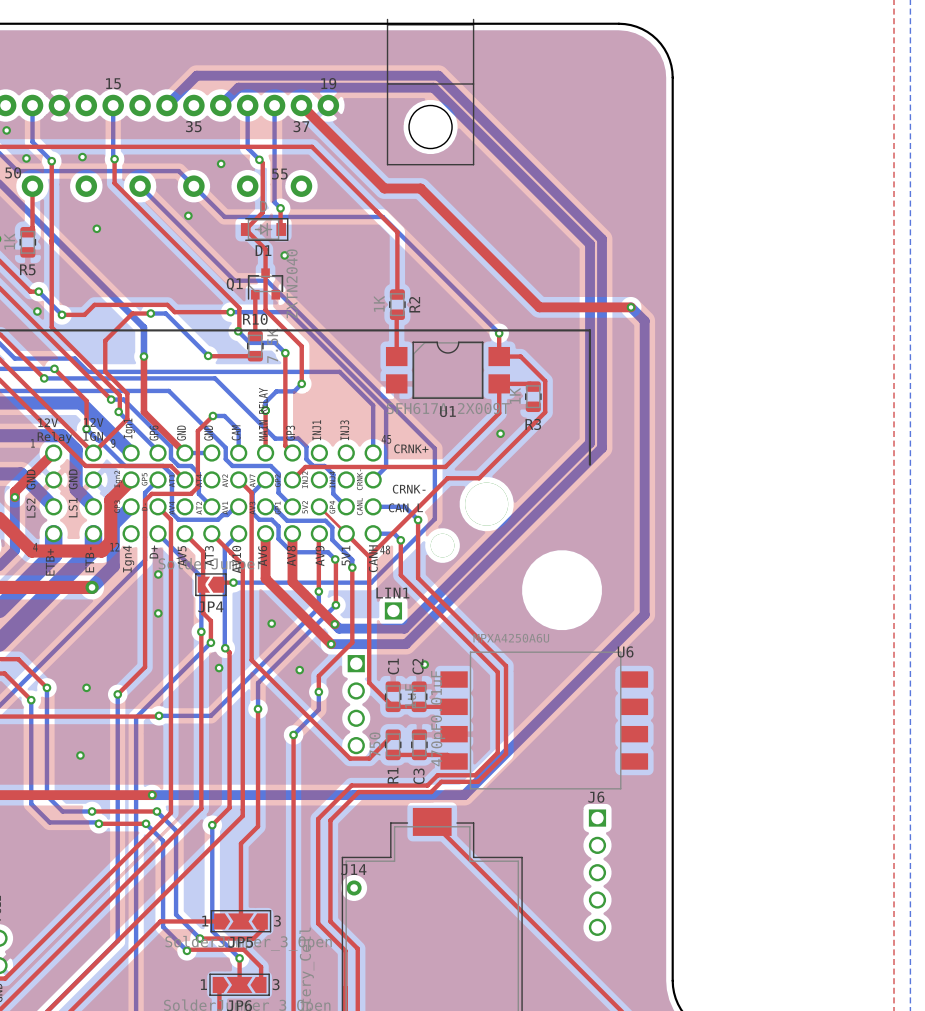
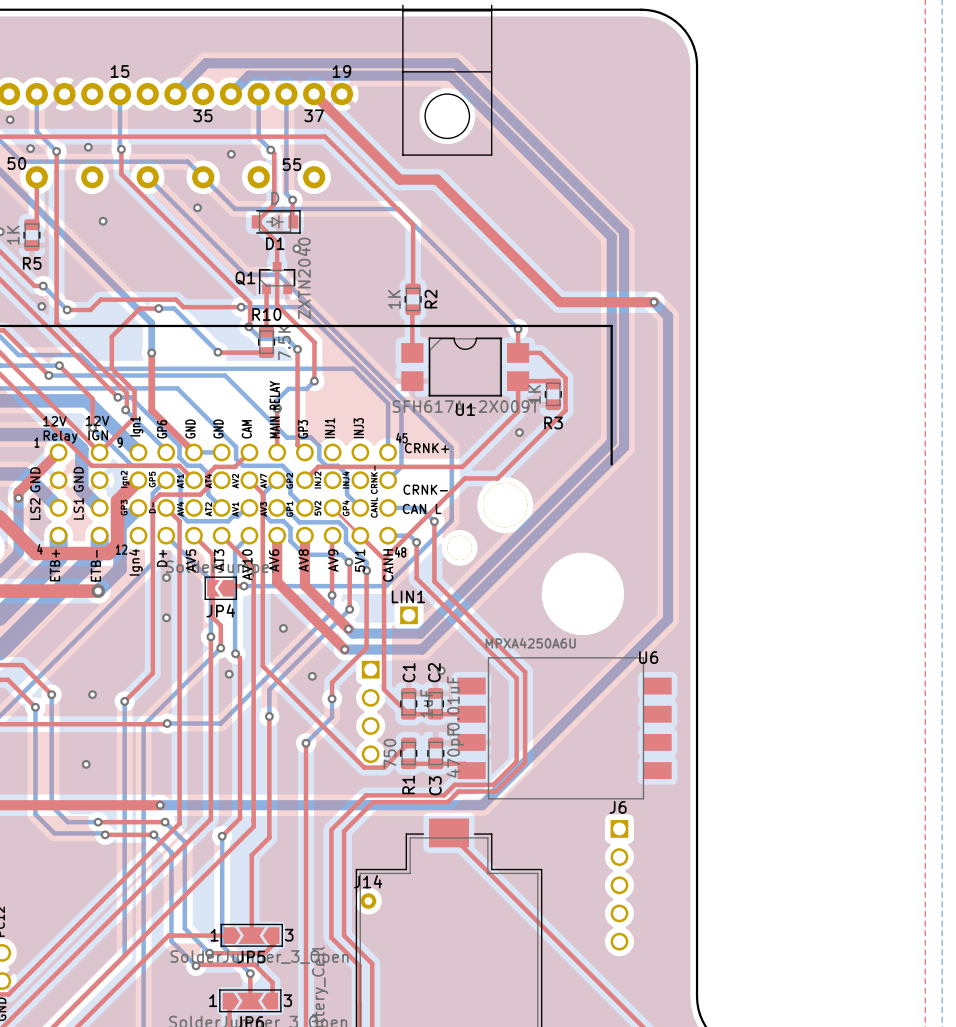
top track: (212, 415) (197, 431) (197, 474) -> (249, 452) (235, 466) (215, 466) (207, 474)
bottom track: (212, 415) (224, 415) (238, 430) (238, 453) -> none
via: (212, 415) -> none

